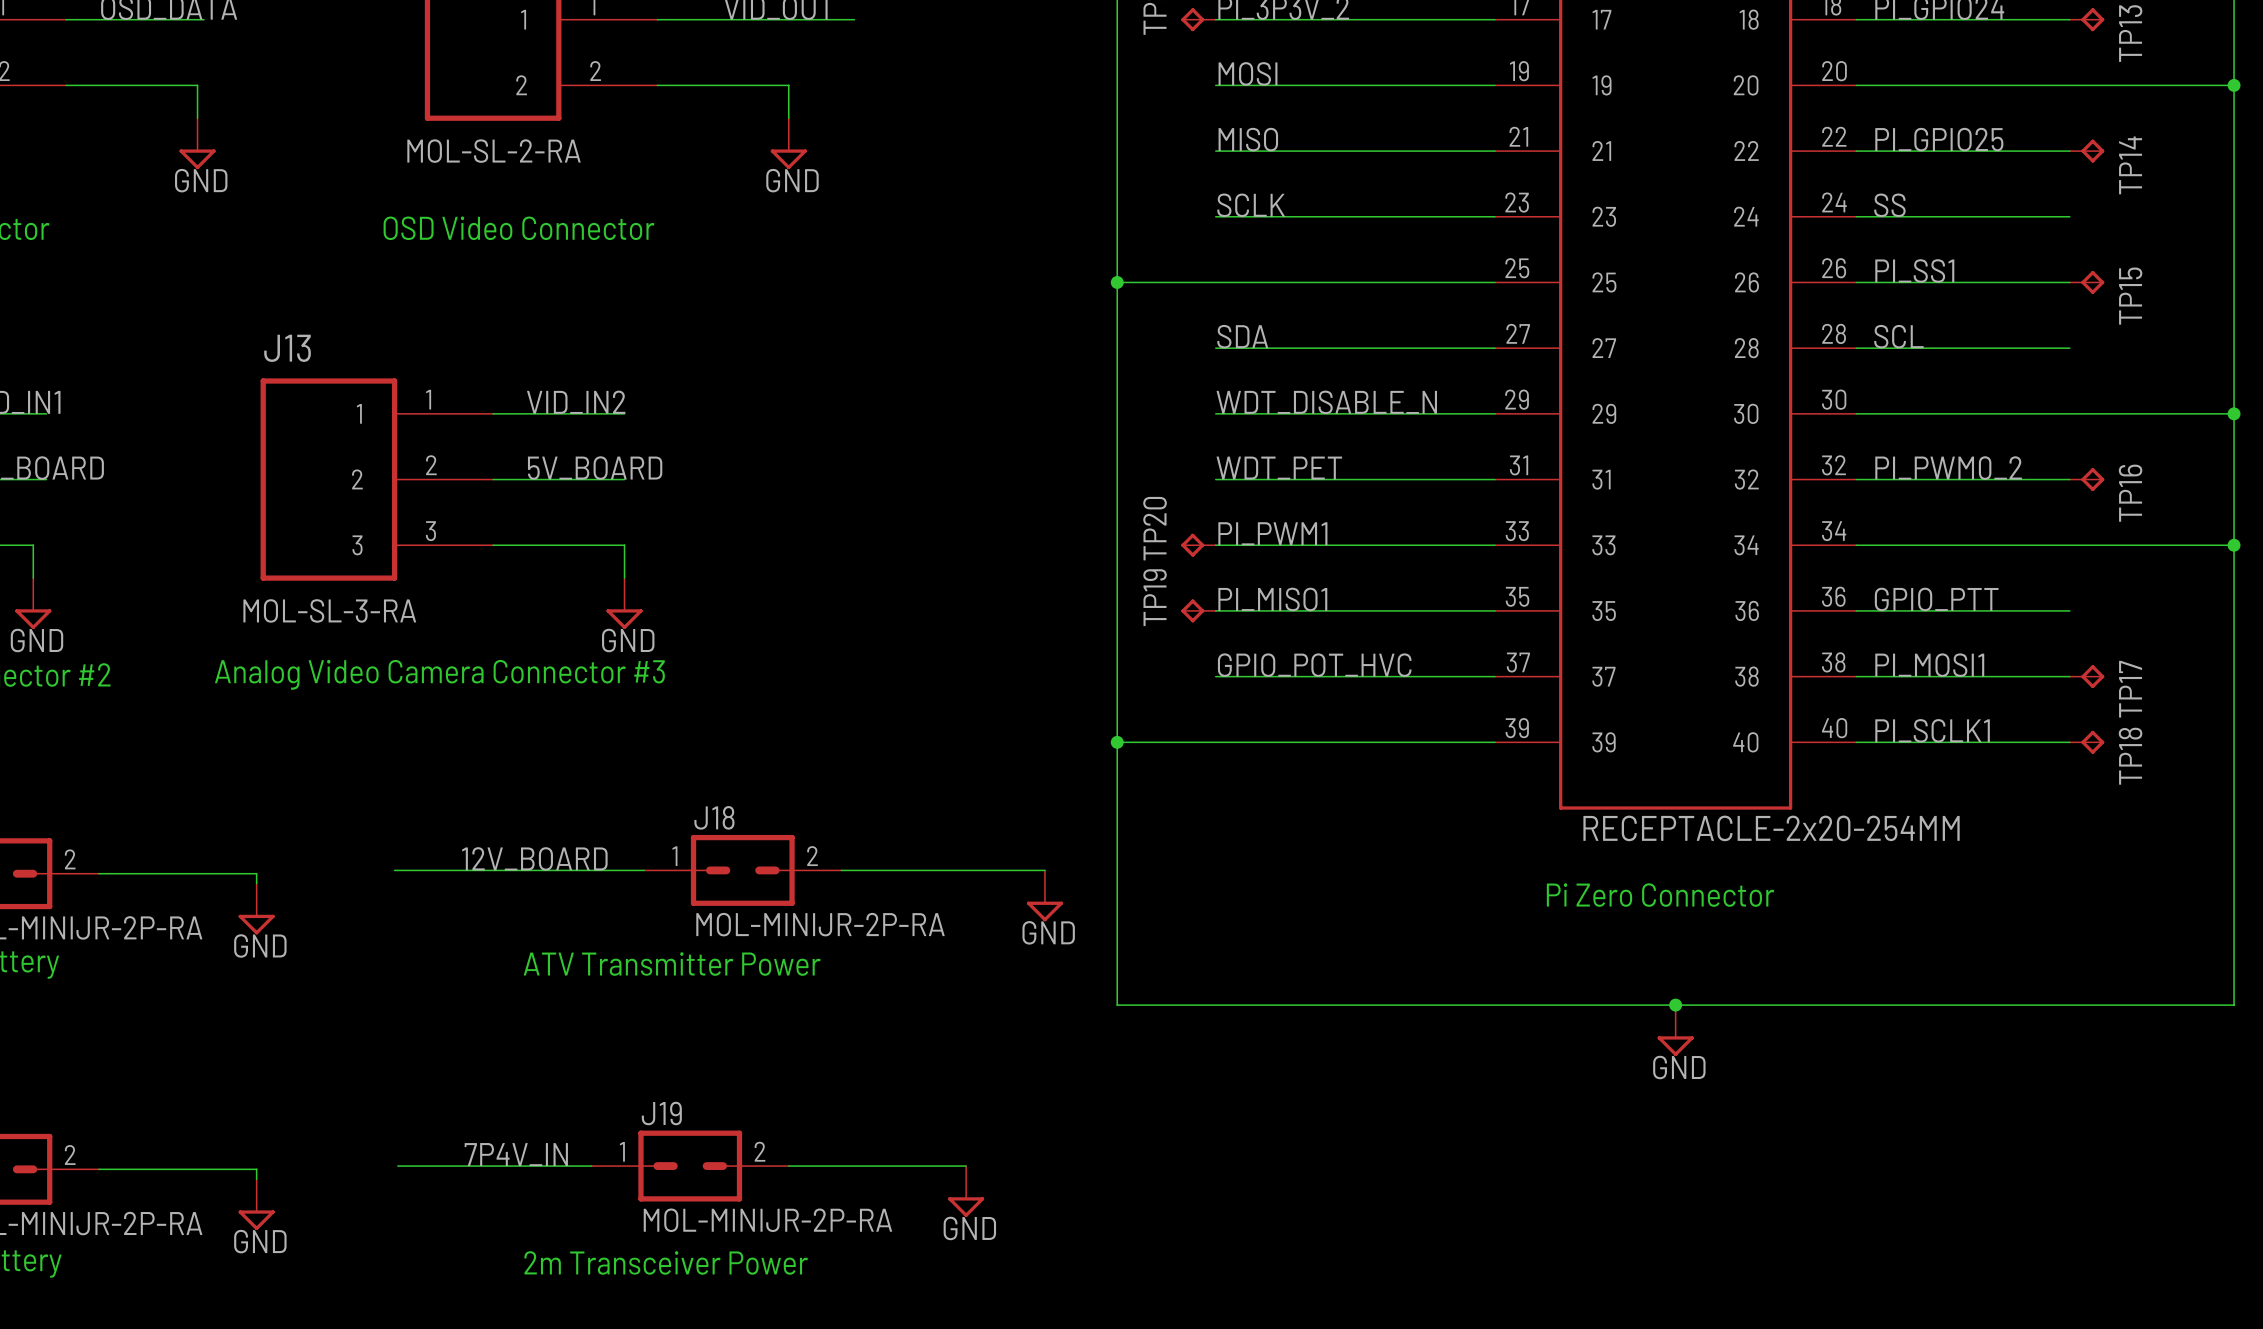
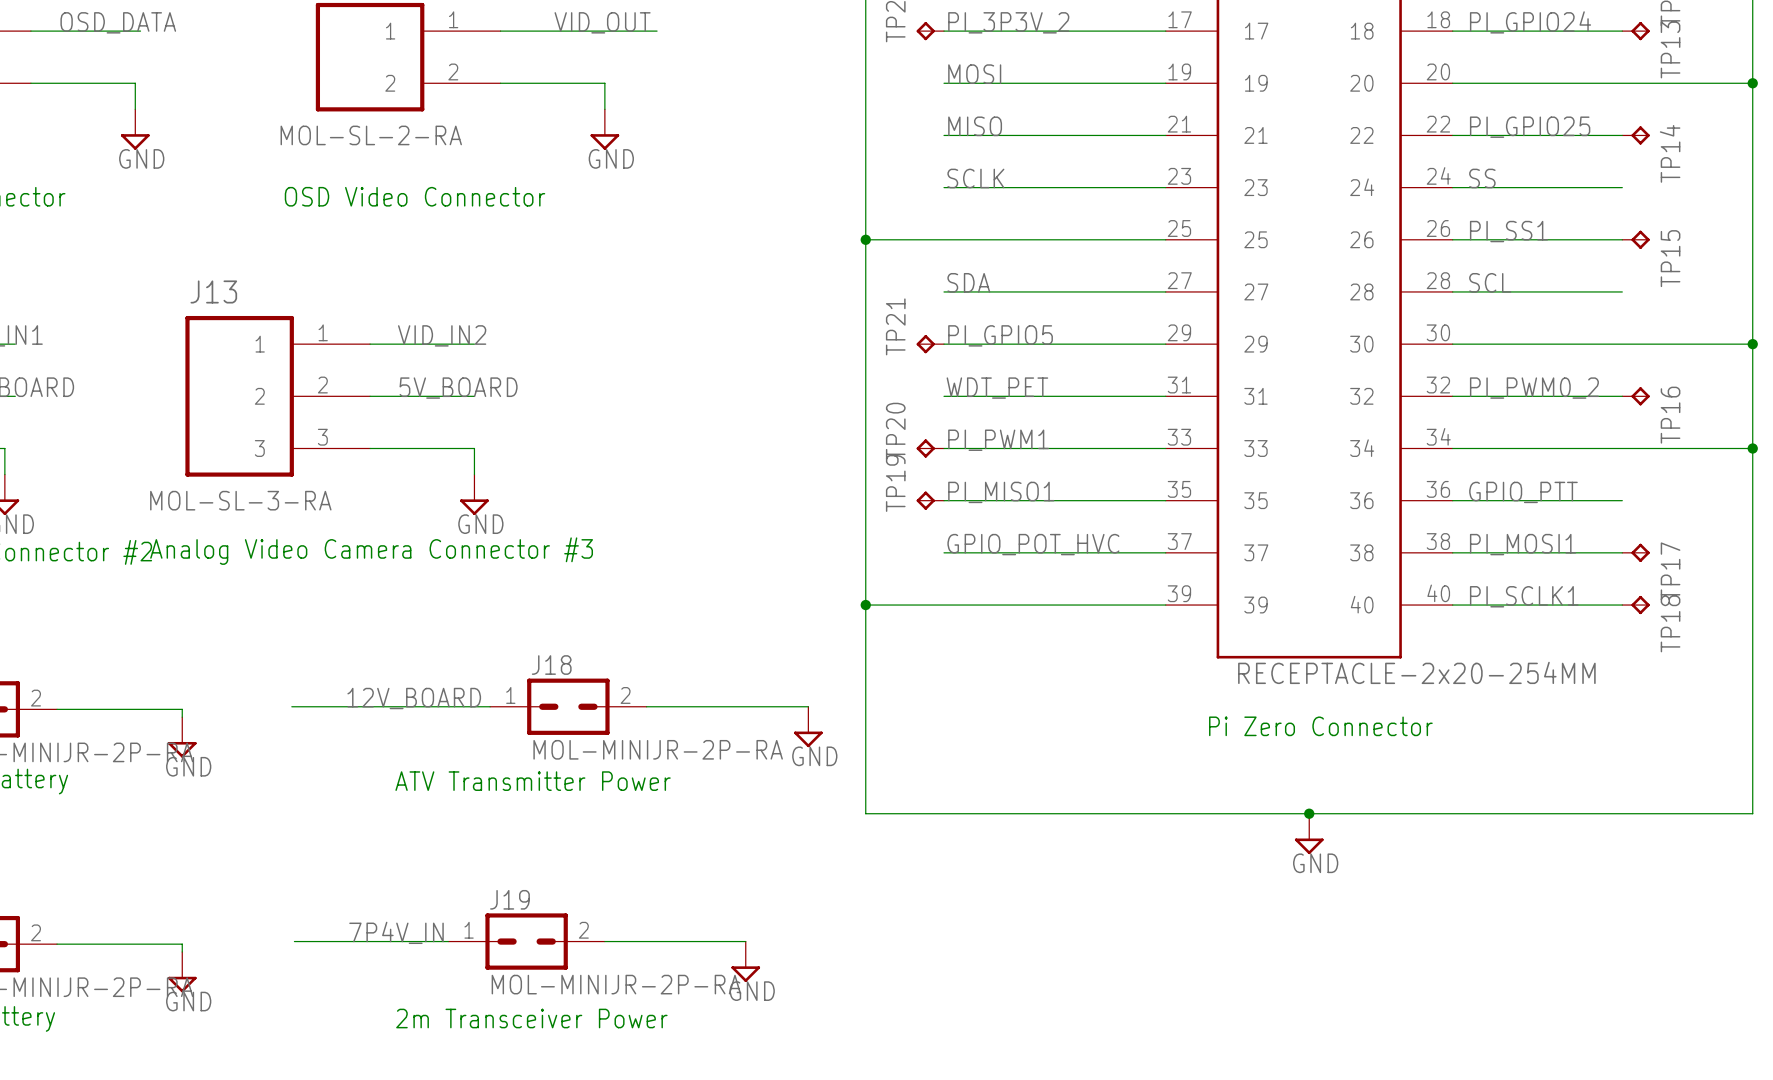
label: WDT_DISABLE_N (1326, 402) -> PI_GPIO5 (1000, 335)
TP21: none -> (930, 344)

